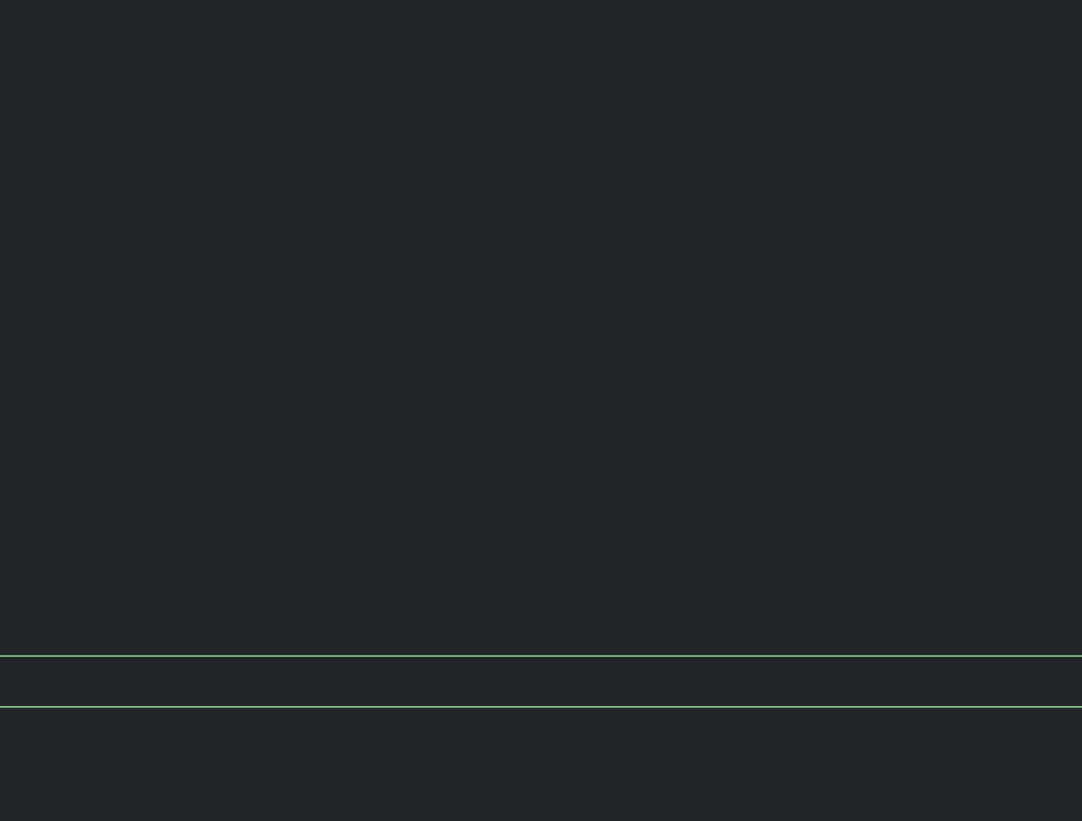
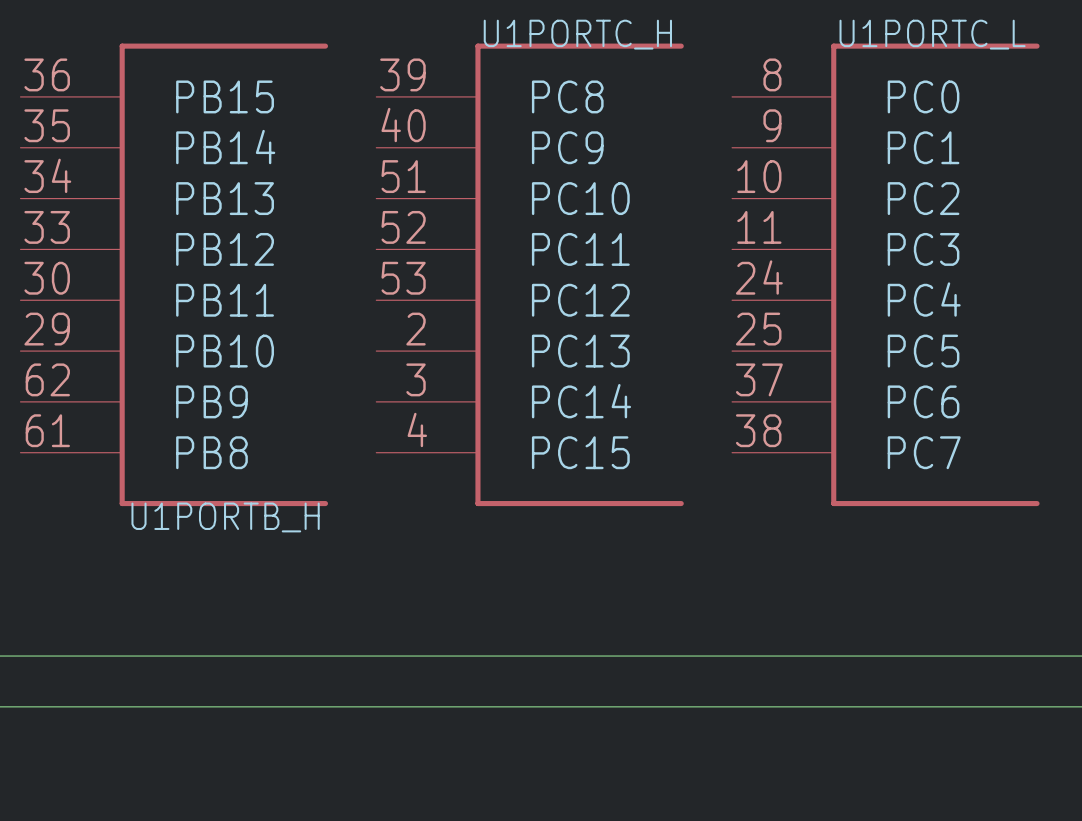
U1PORTB_H: none -> (174, 274)
U1PORTC_H: none -> (530, 274)
U1PORTC_L: none -> (885, 274)

